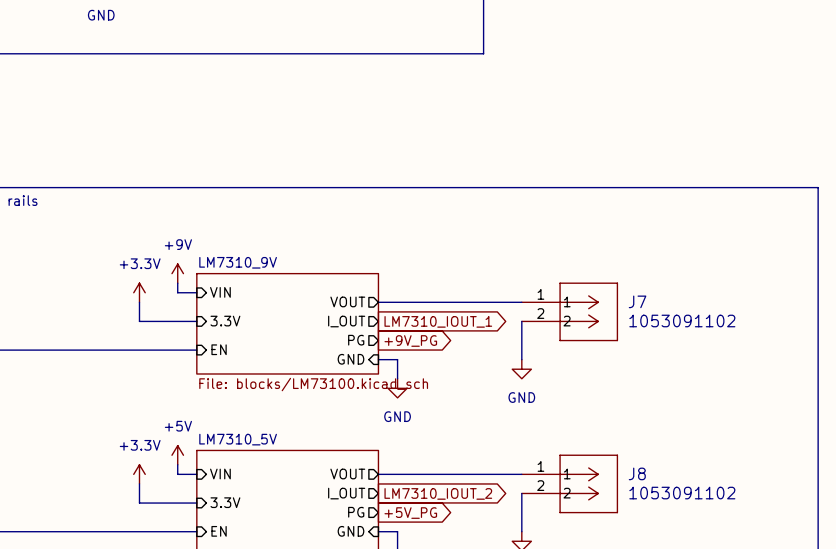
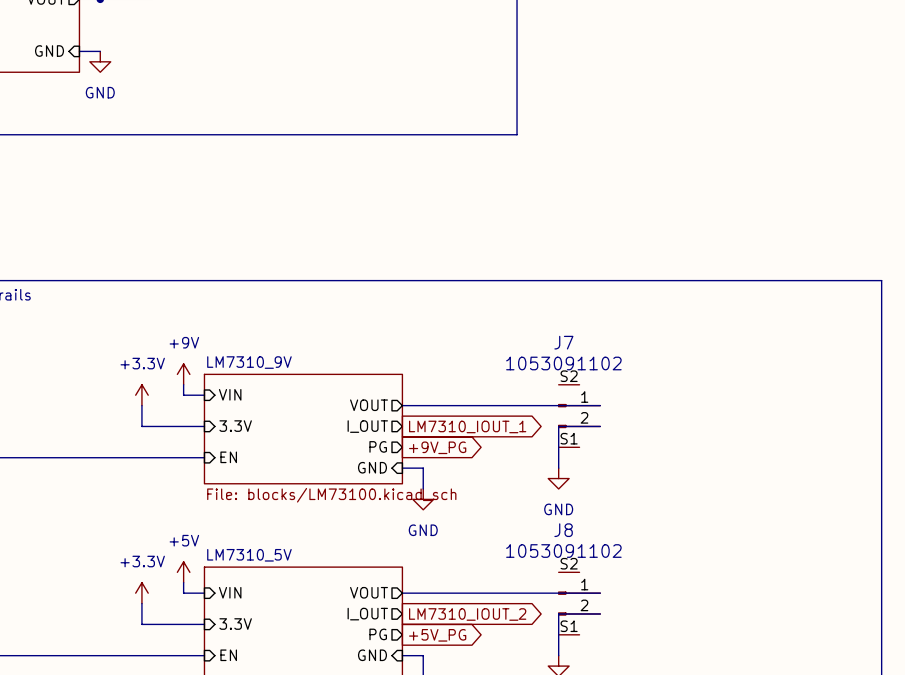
J7 symbol: [521, 282, 618, 342] -> [558, 384, 601, 448]
J7 name position: J7 (637, 301) -> J7 (563, 342)
J7 value position: 1053091102 (682, 320) -> 1053091102 (563, 363)
J8 symbol: [521, 454, 618, 514] -> [558, 572, 601, 635]
J8 name position: J8 (637, 473) -> J8 (563, 530)
J8 value position: 1053091102 (682, 493) -> 1053091102 (563, 551)

